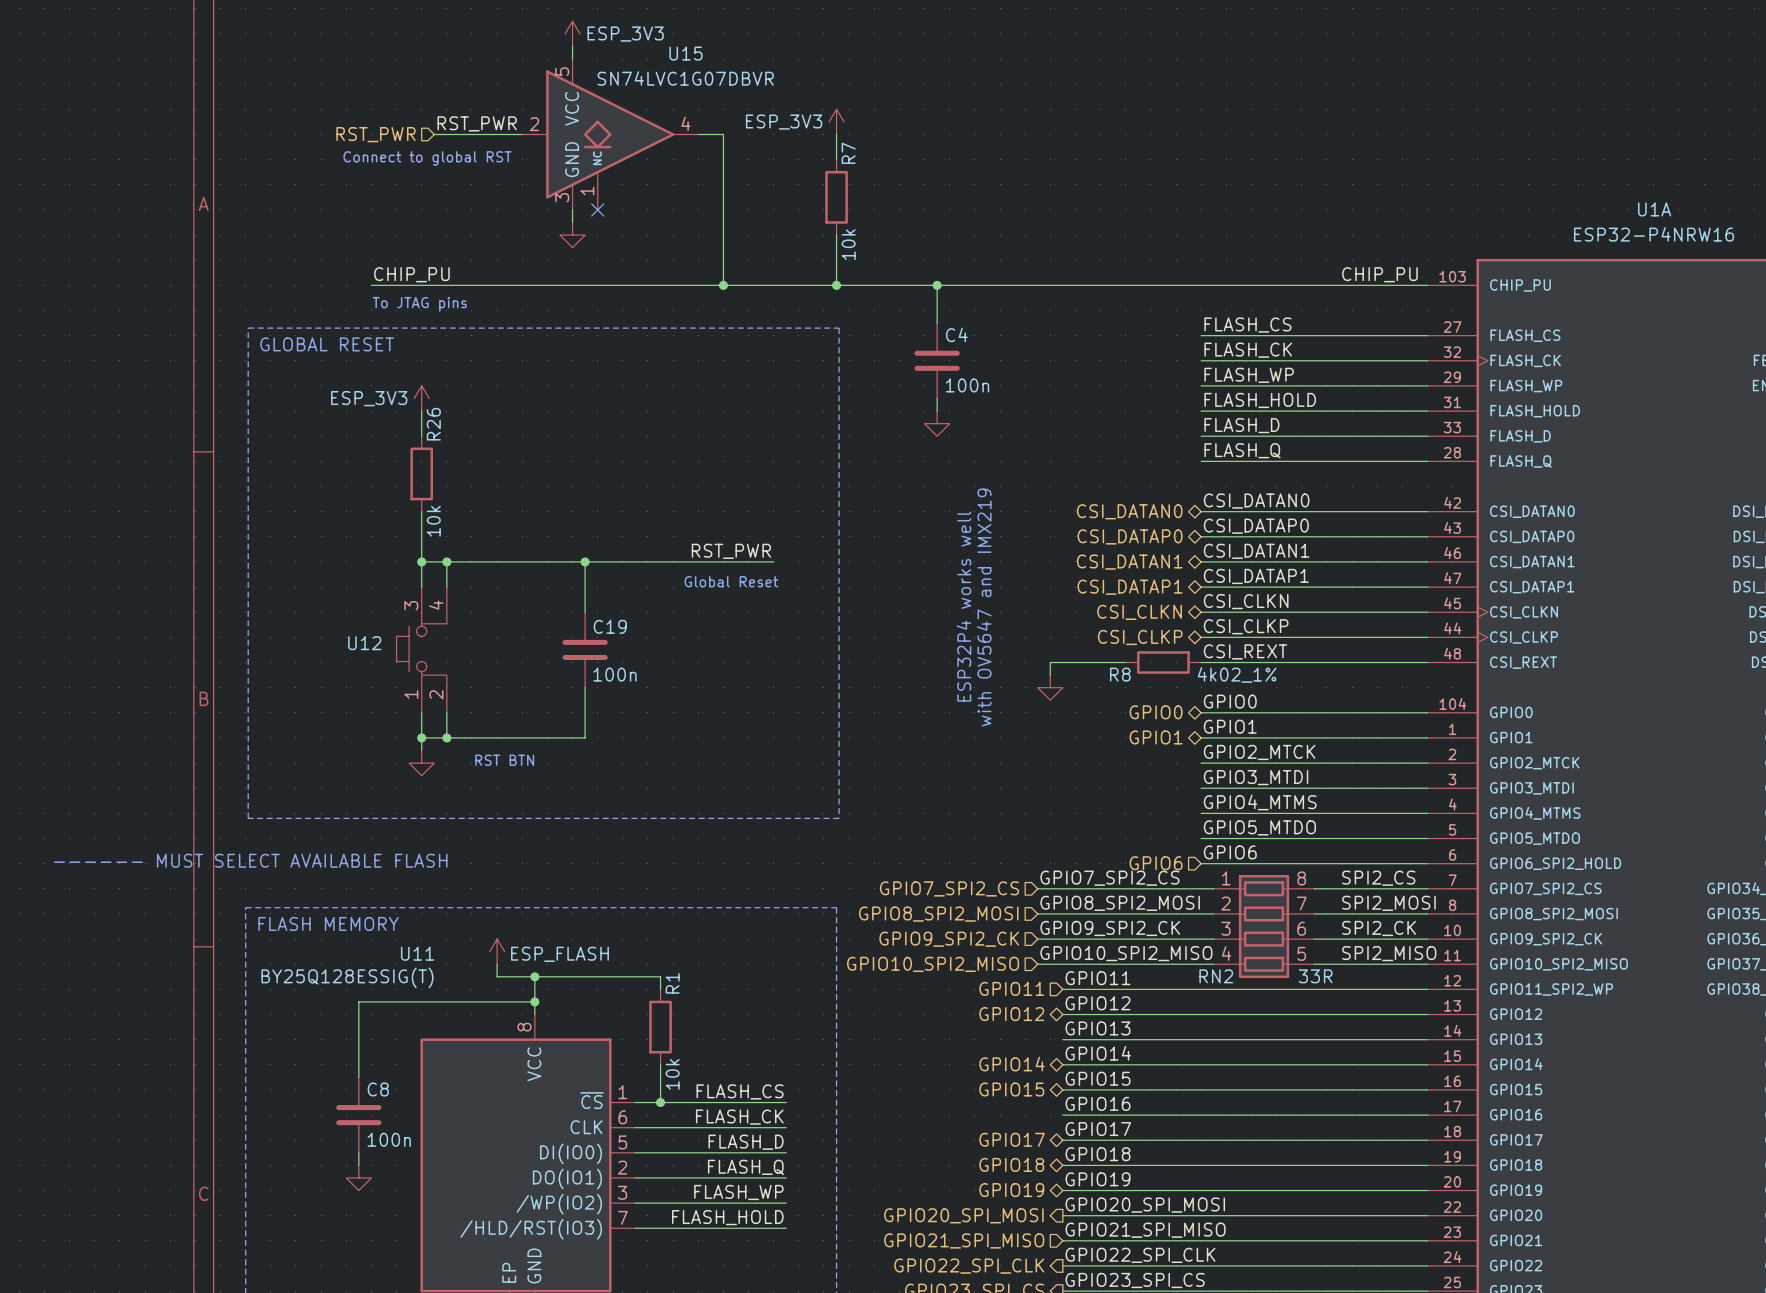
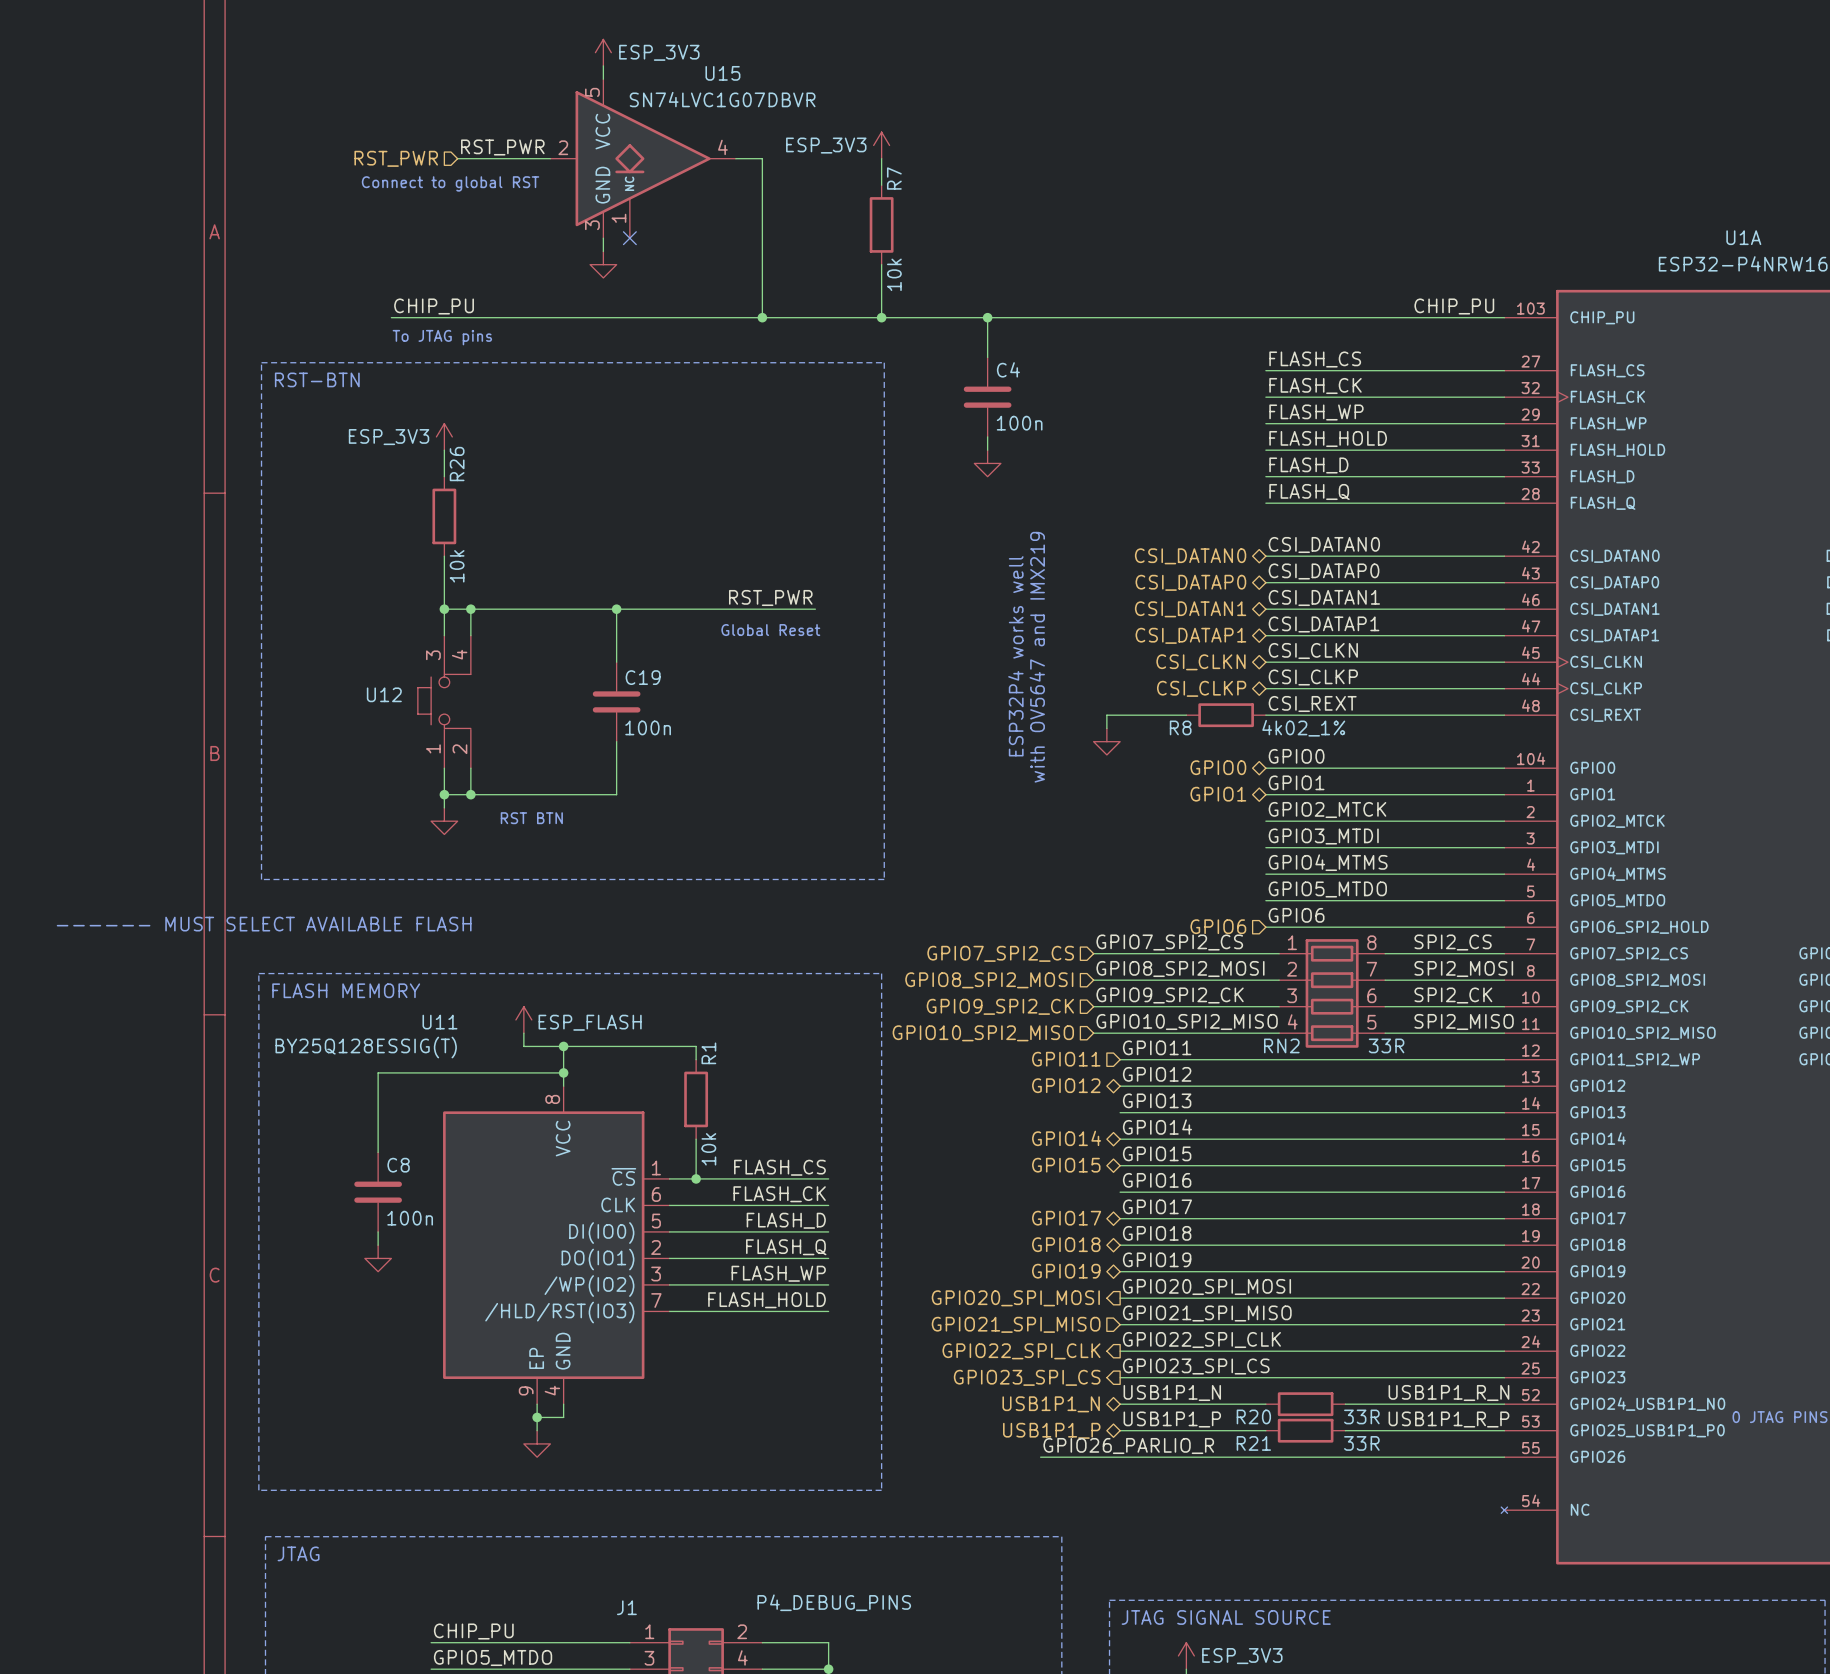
text: GLOBAL RESET (327, 344) -> RST-BTN (317, 379)

